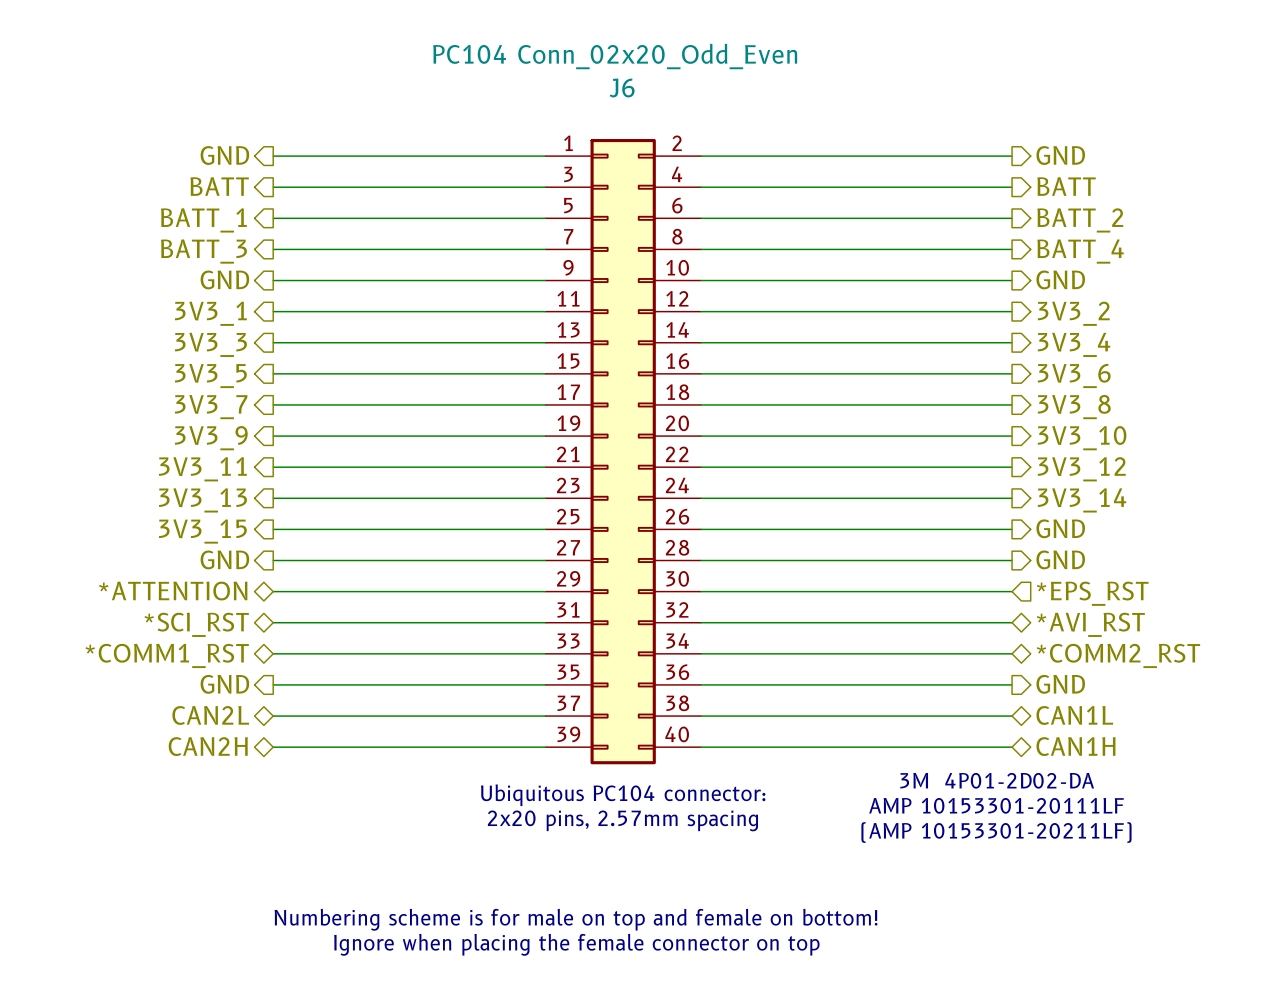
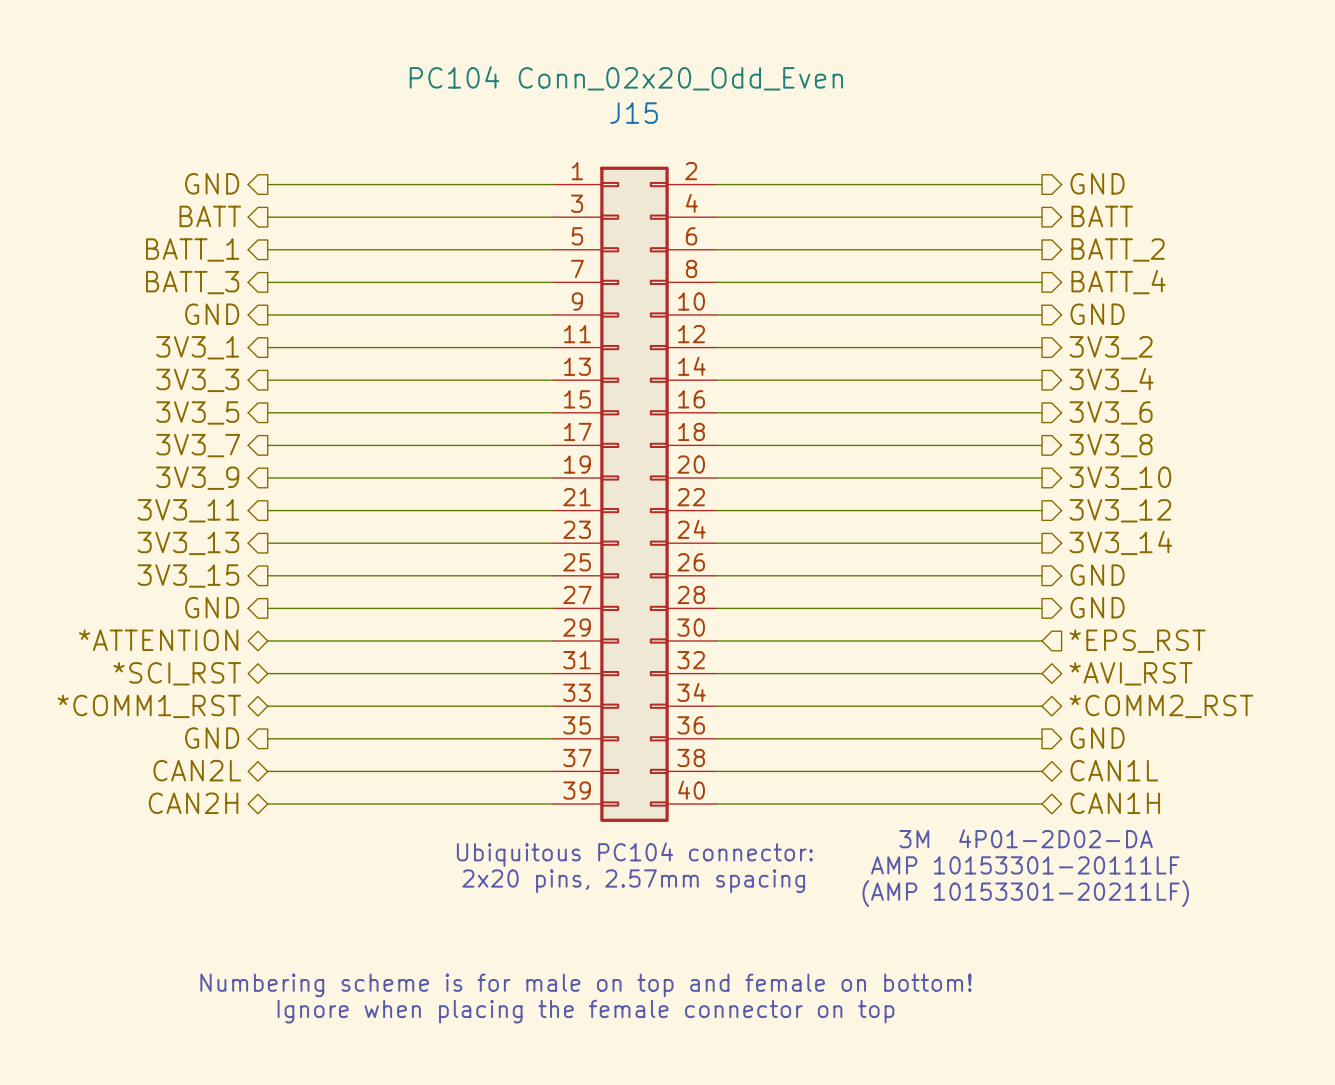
J6 name: J6 (622, 88) -> J15 (634, 113)

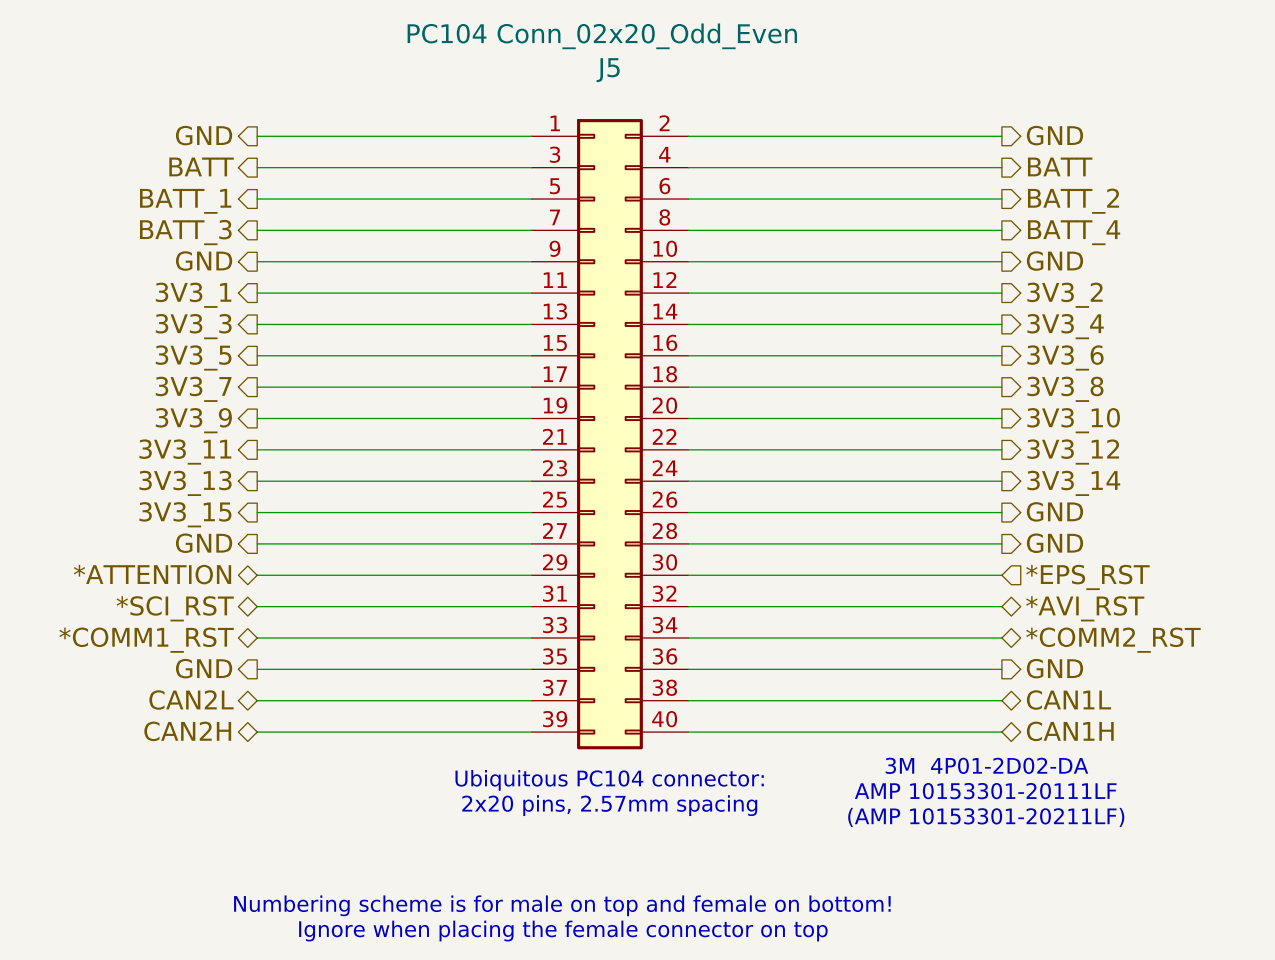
J15 name: J15 (634, 113) -> J5 (608, 70)

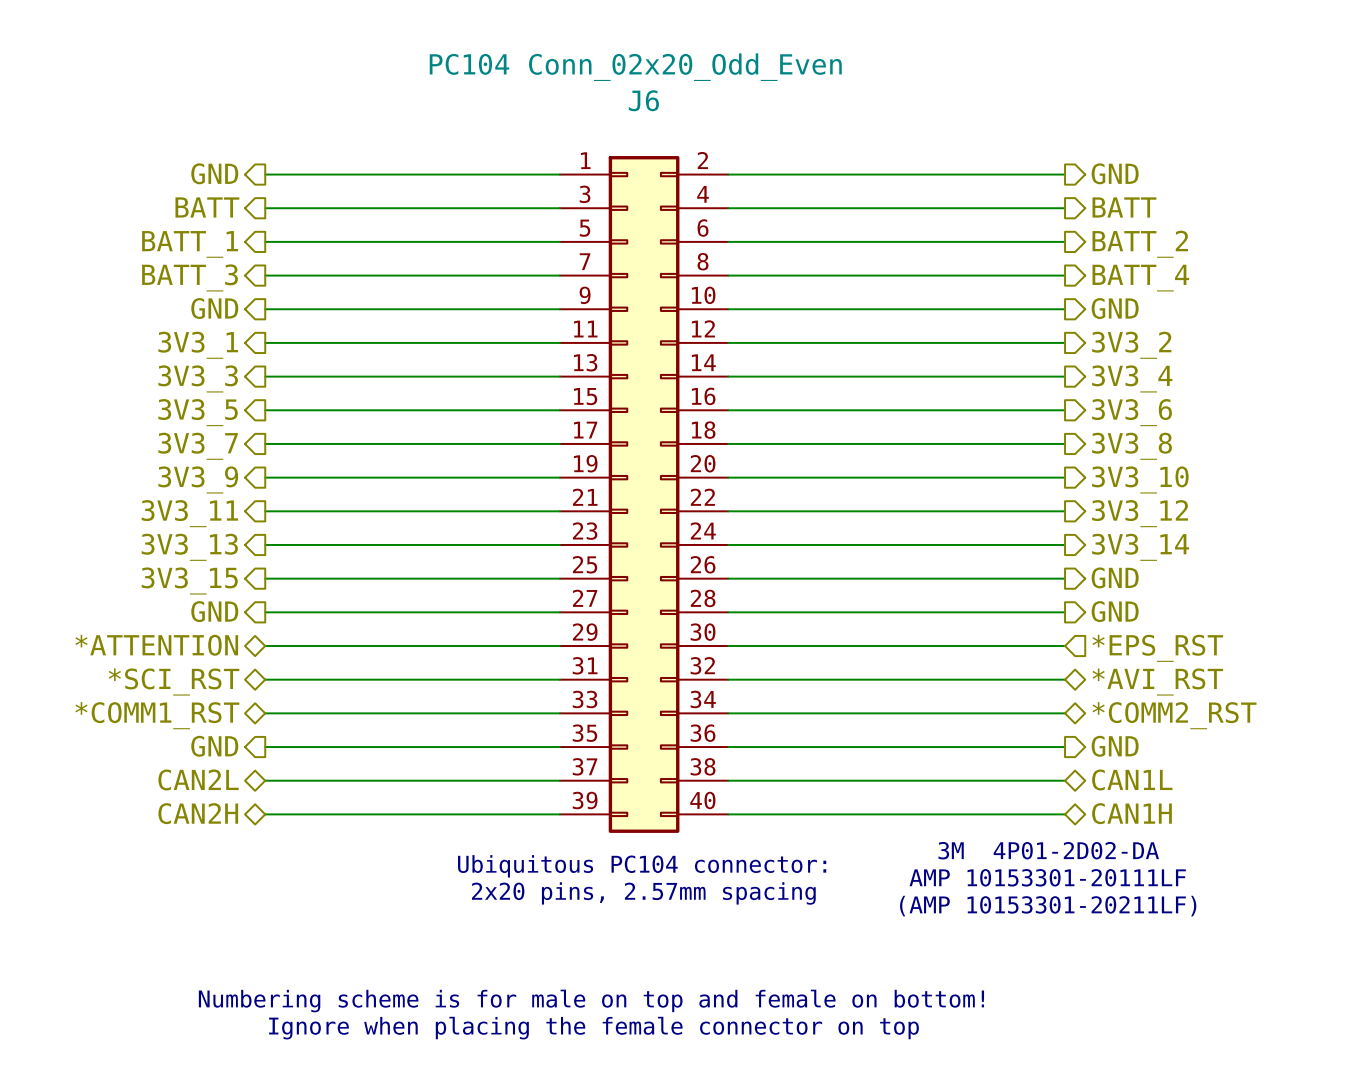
J5 name: J5 (608, 70) -> J6 (643, 100)

